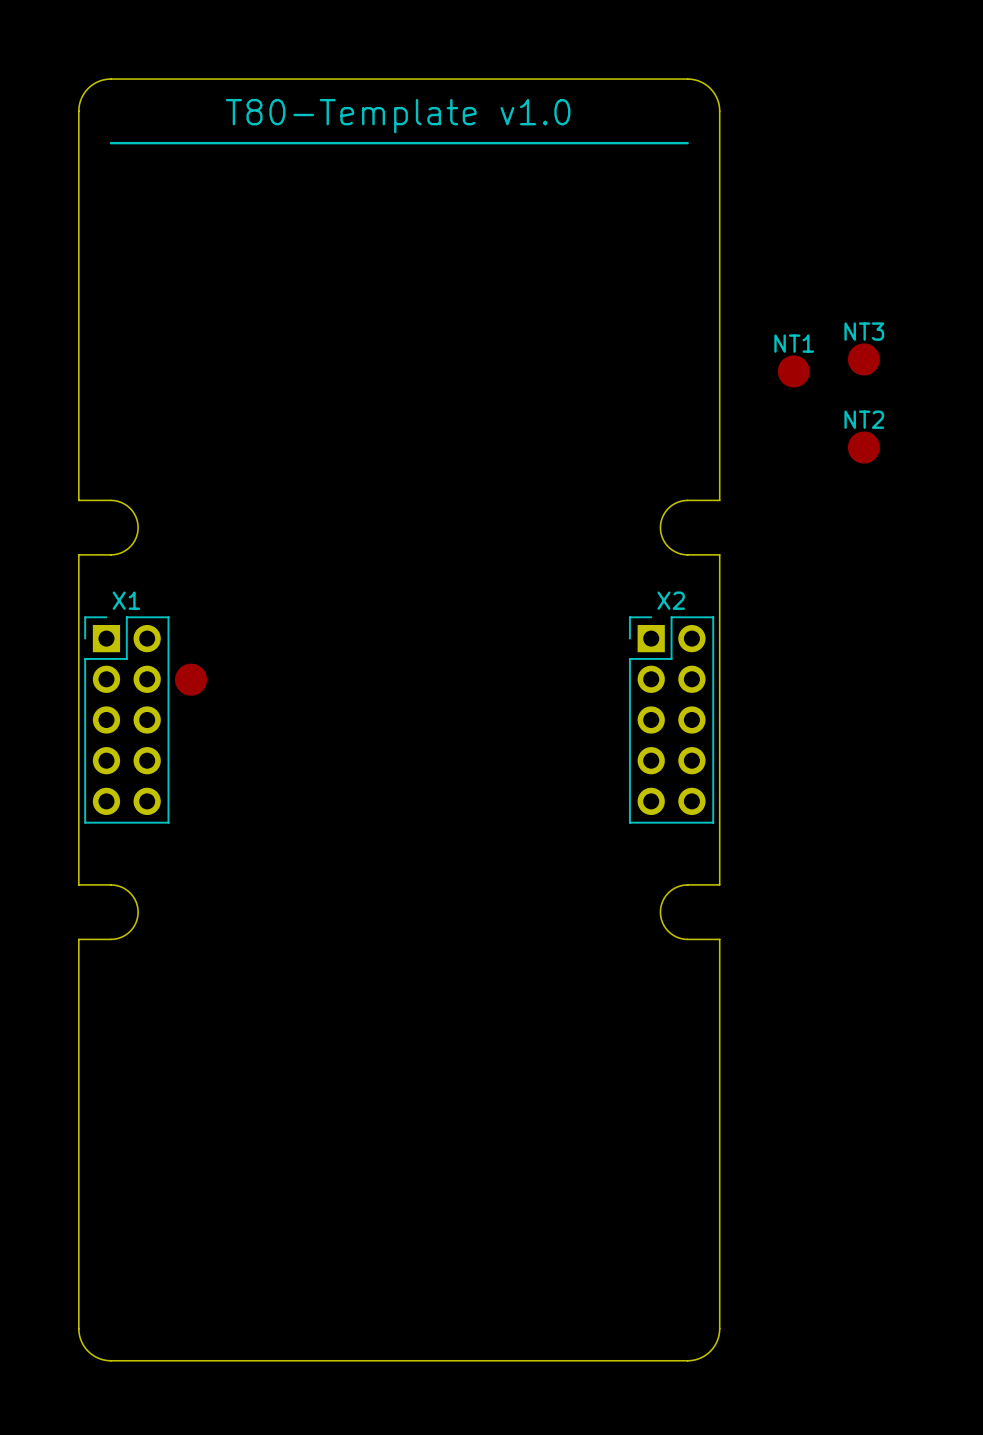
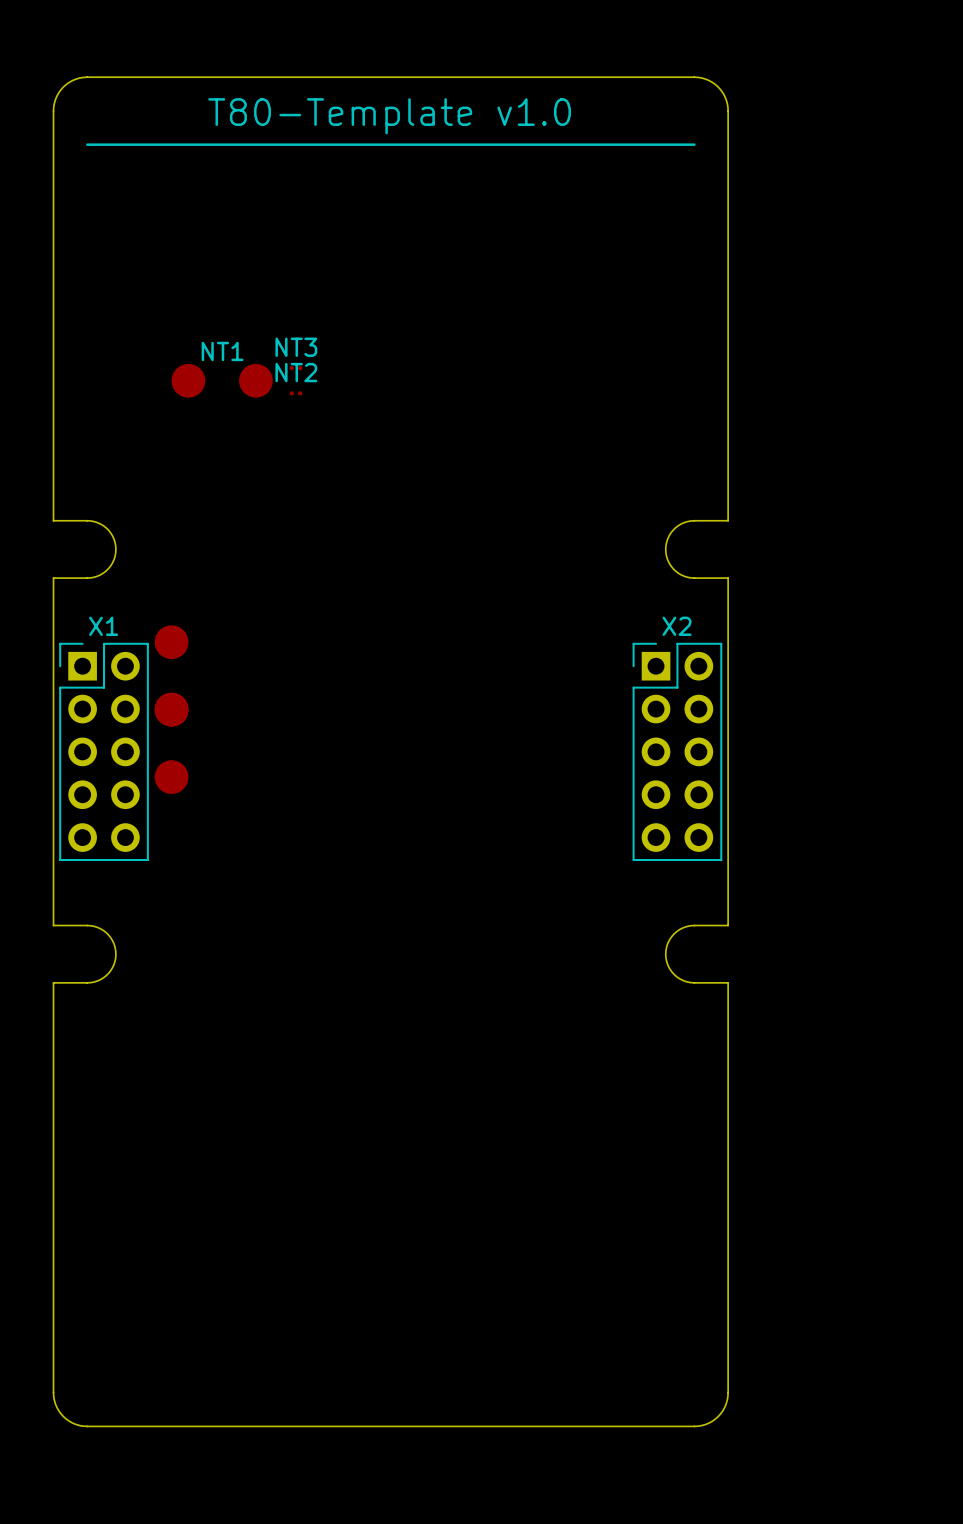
NT3 footprint: [847, 343, 880, 376] -> [289, 366, 303, 371]
NT1 footprint: [777, 355, 810, 388] -> [171, 363, 273, 398]
NT2 footprint: [847, 431, 880, 464] -> [289, 391, 303, 396]
part: none -> (171, 675)
part: (190, 679) -> none
part: none -> (171, 743)

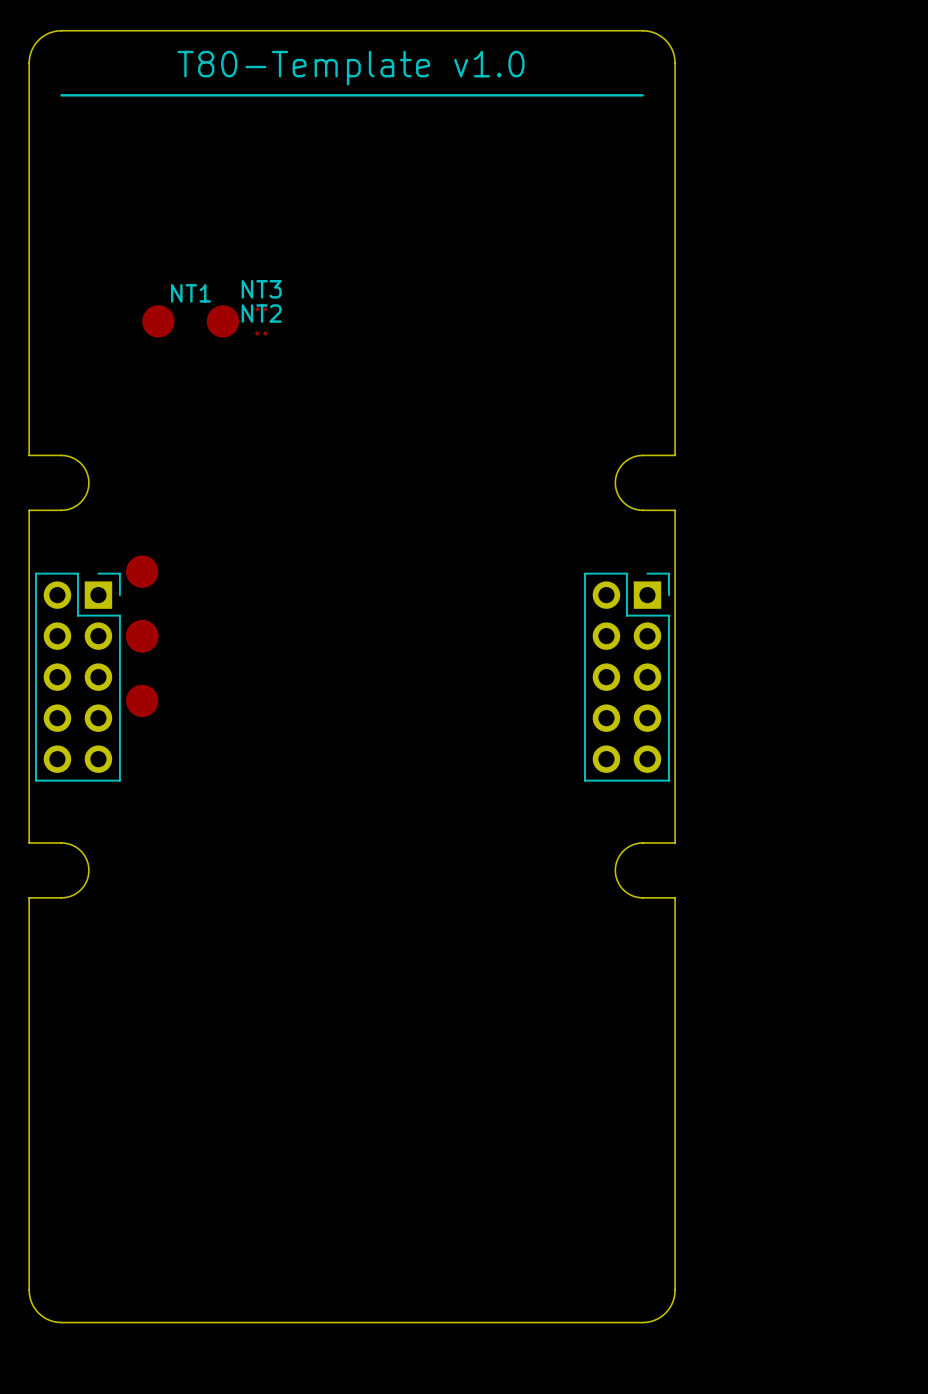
X1: (104, 751) -> none
X2: (677, 751) -> none
part: none -> (77, 677)
part: none -> (626, 677)

